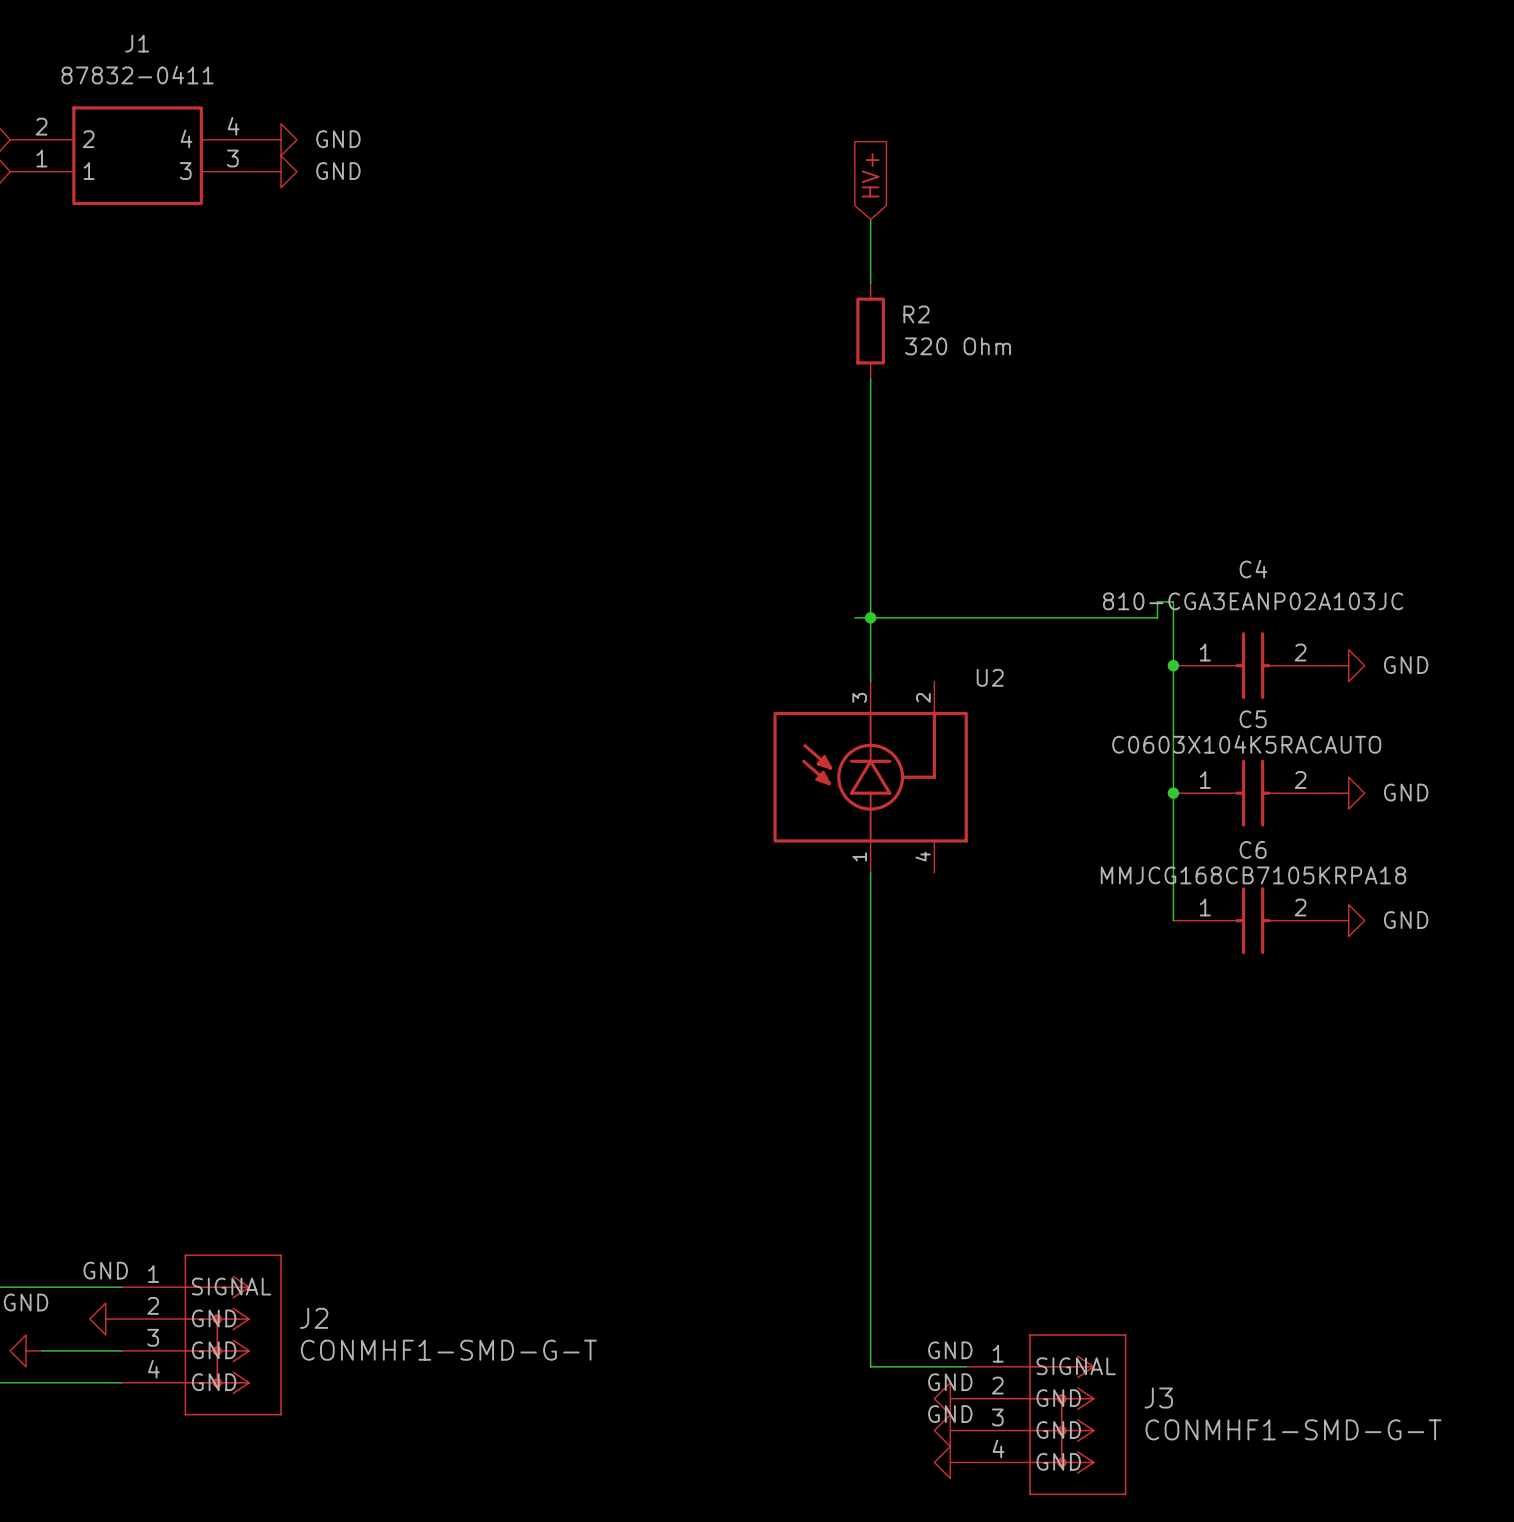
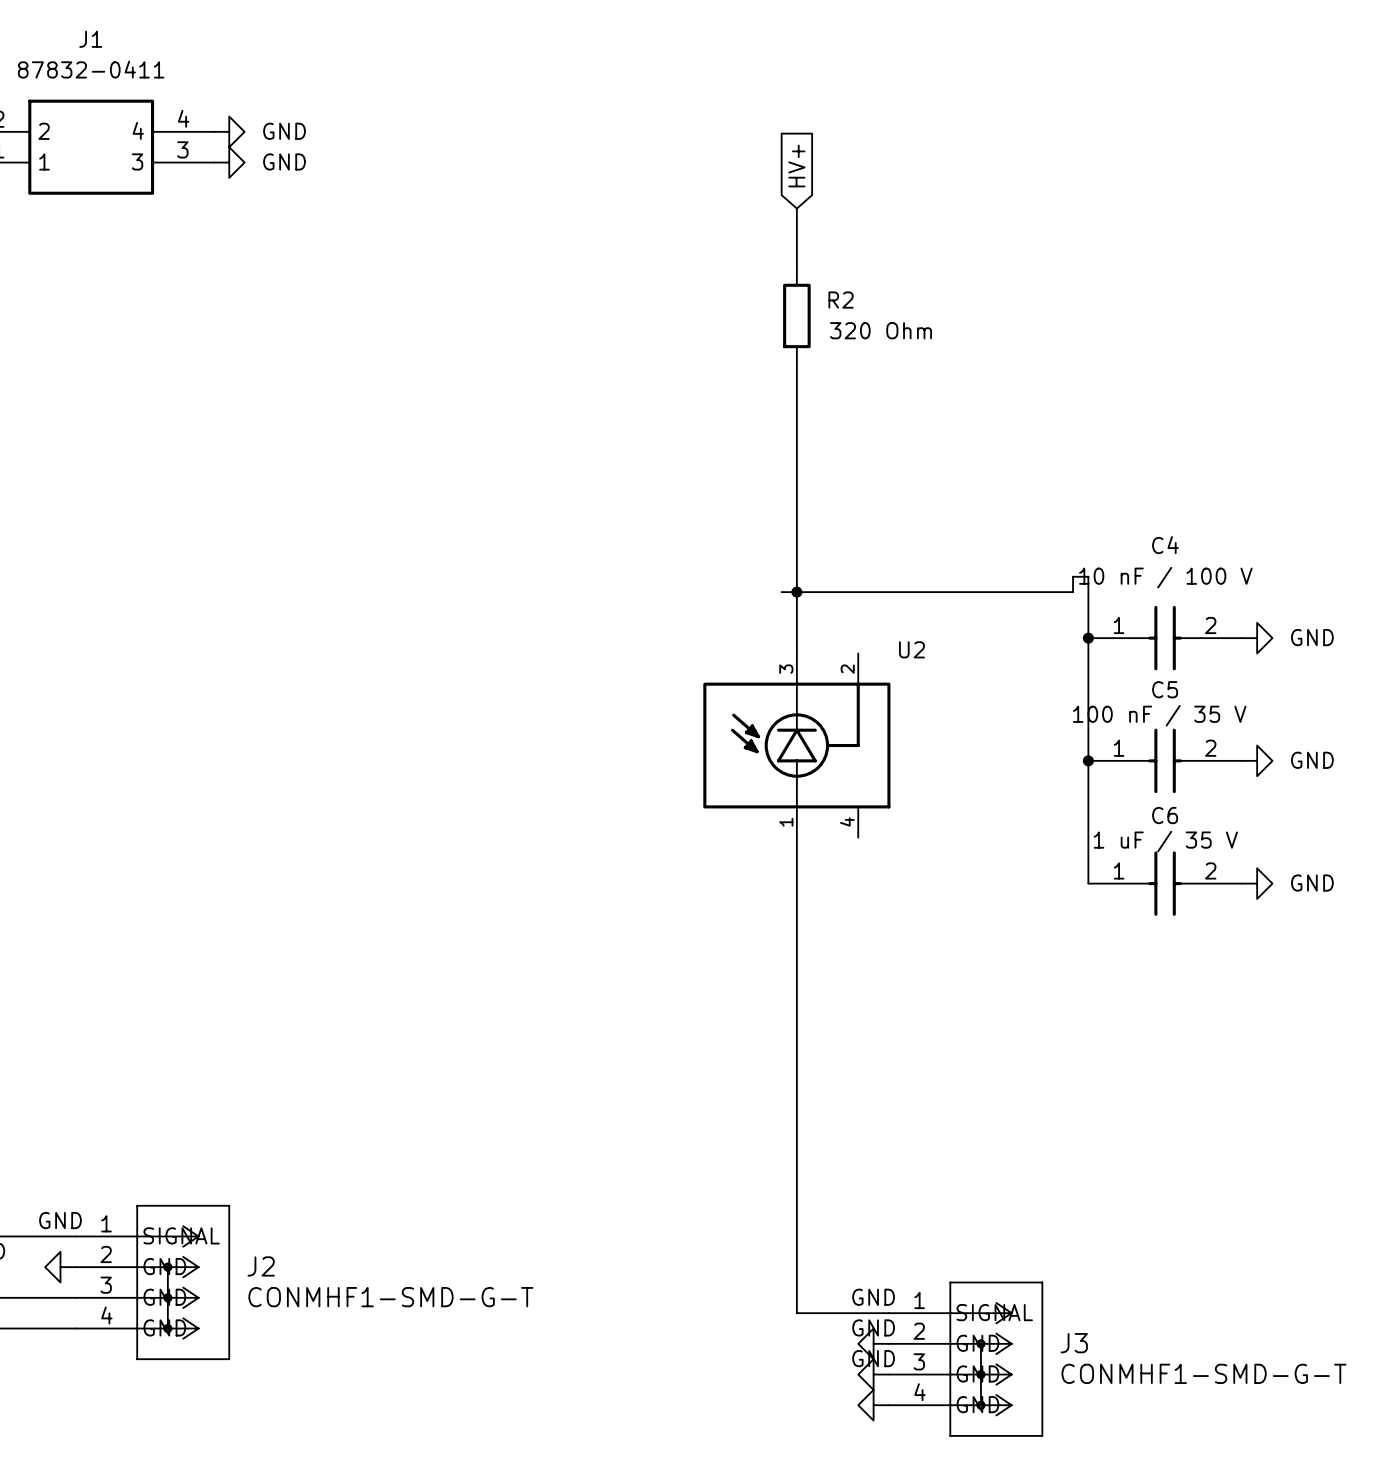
C4 value: 810-CGA3EANP02A103JC (1253, 601) -> 10 nF / 100 V (1165, 577)
C5 value: C0603X104K5RACAUTO (1246, 744) -> 100 nF / 35 V (1159, 715)
C6 value: MMJCG168CB7105KRPA18 (1253, 875) -> 1 uF / 35 V (1165, 841)

